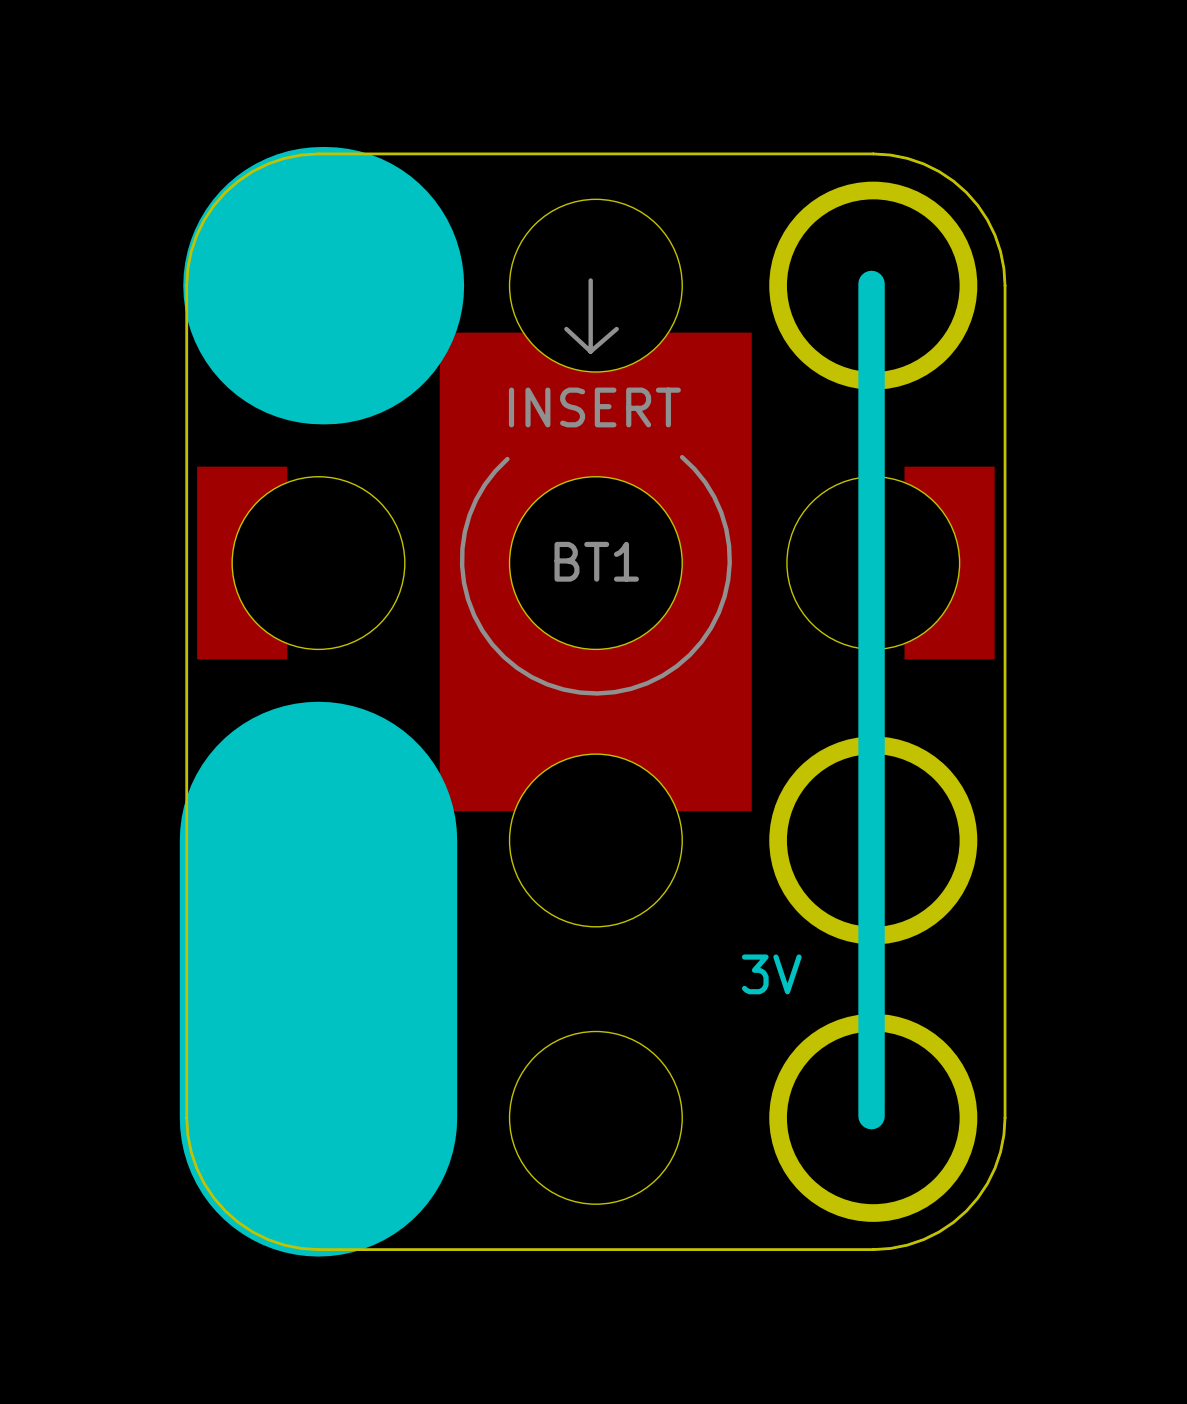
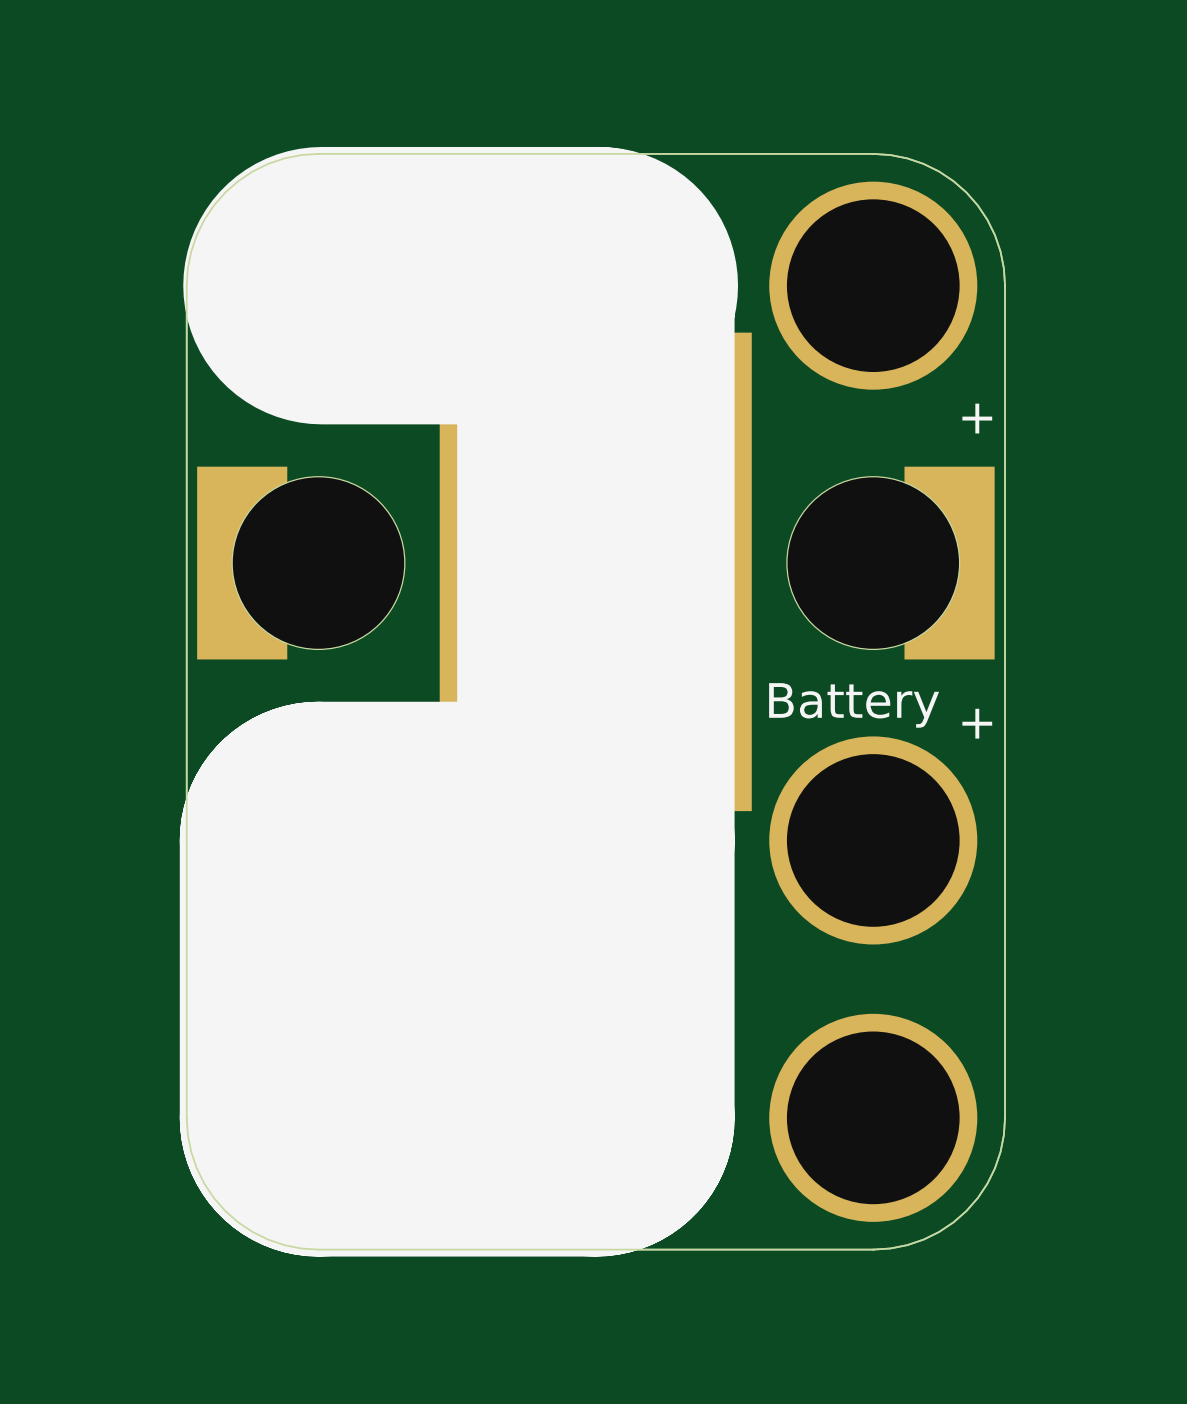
BT1 footprint: [179, 146, 1007, 1257] -> [179, 146, 1006, 1257]
BT1 value: none -> Battery (854, 705)

